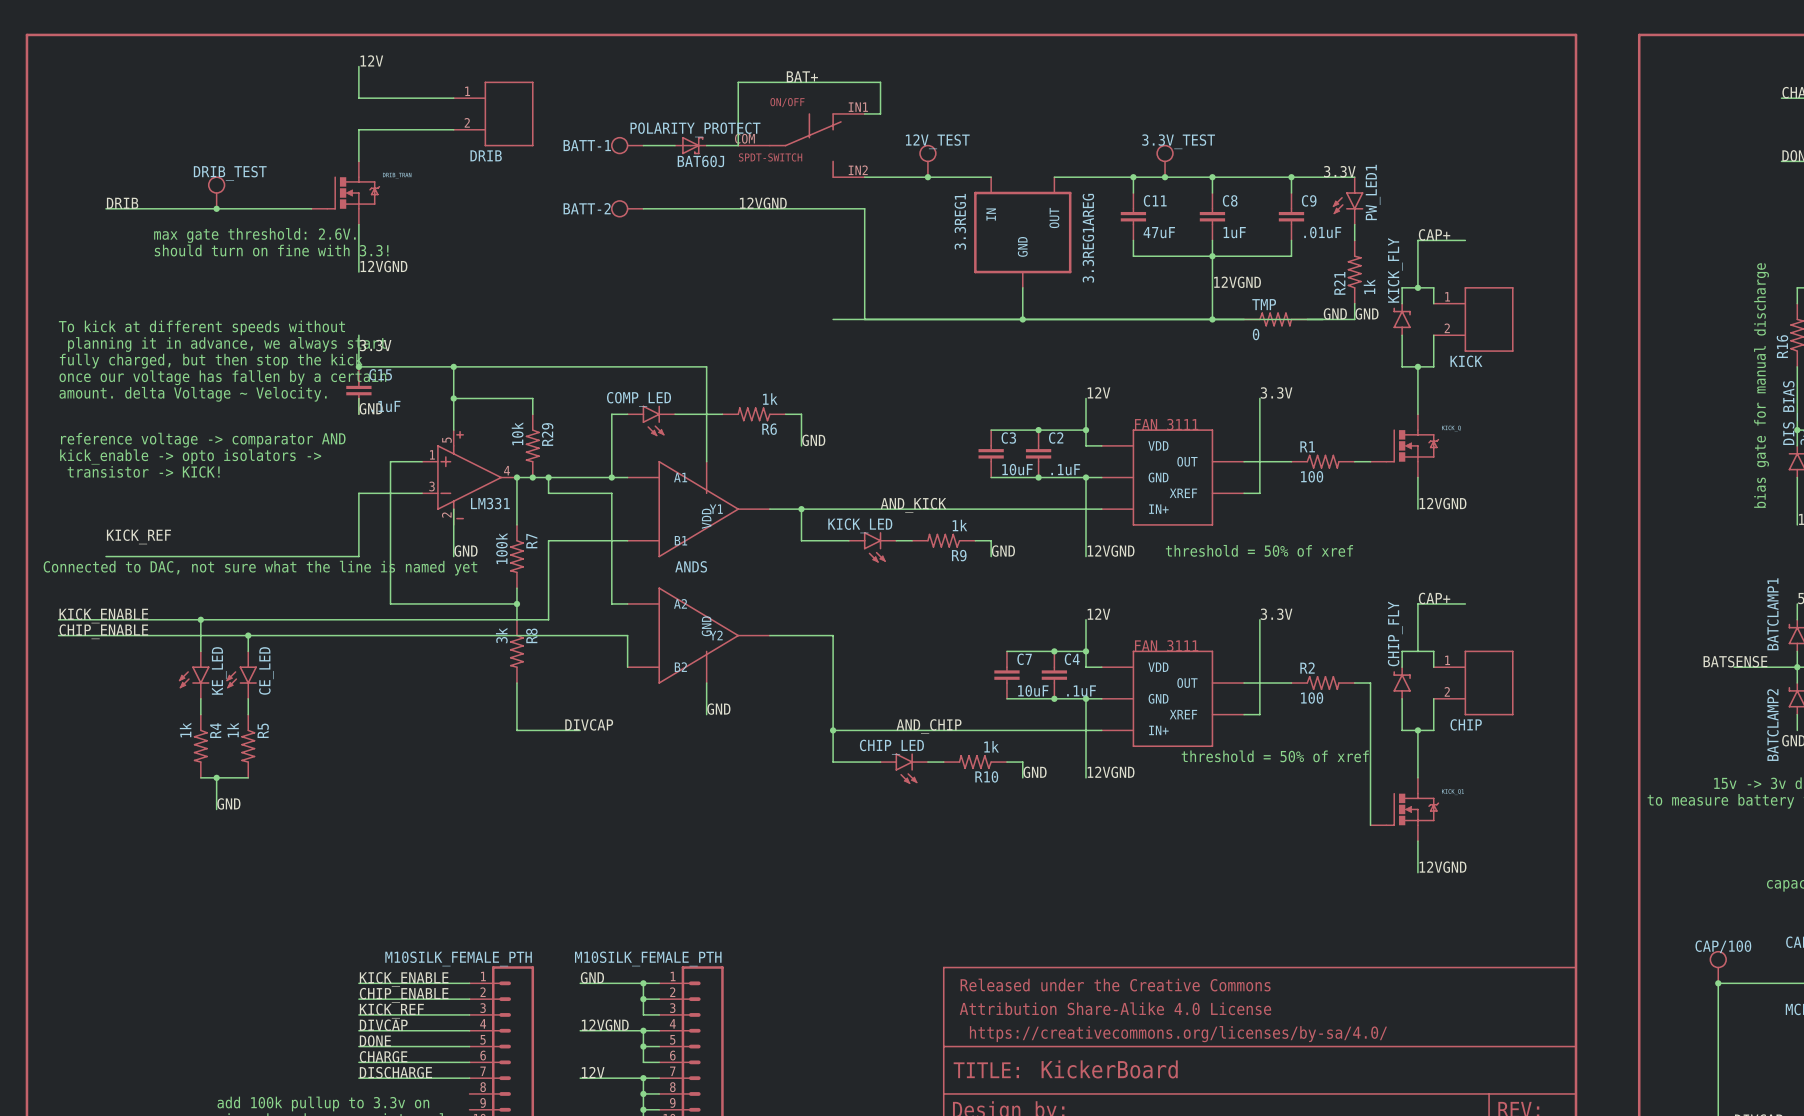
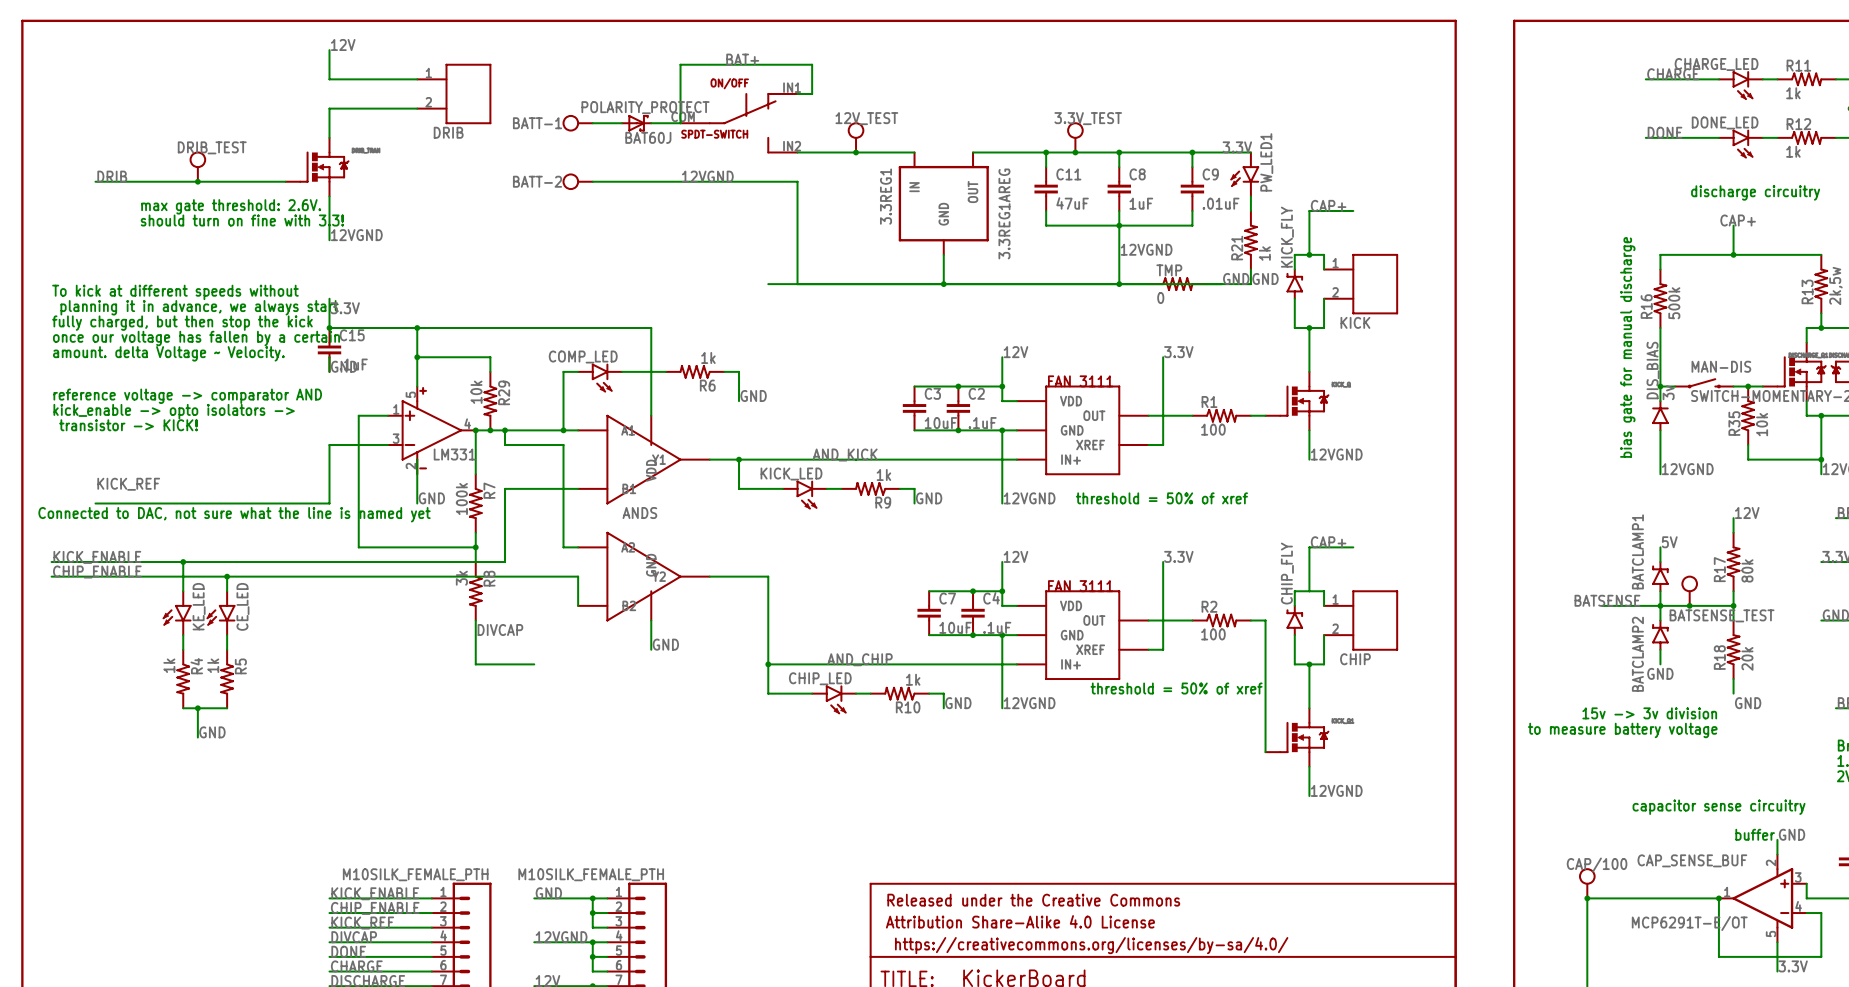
label position: DIVCAP (589, 724) -> DIVCAP (500, 630)

